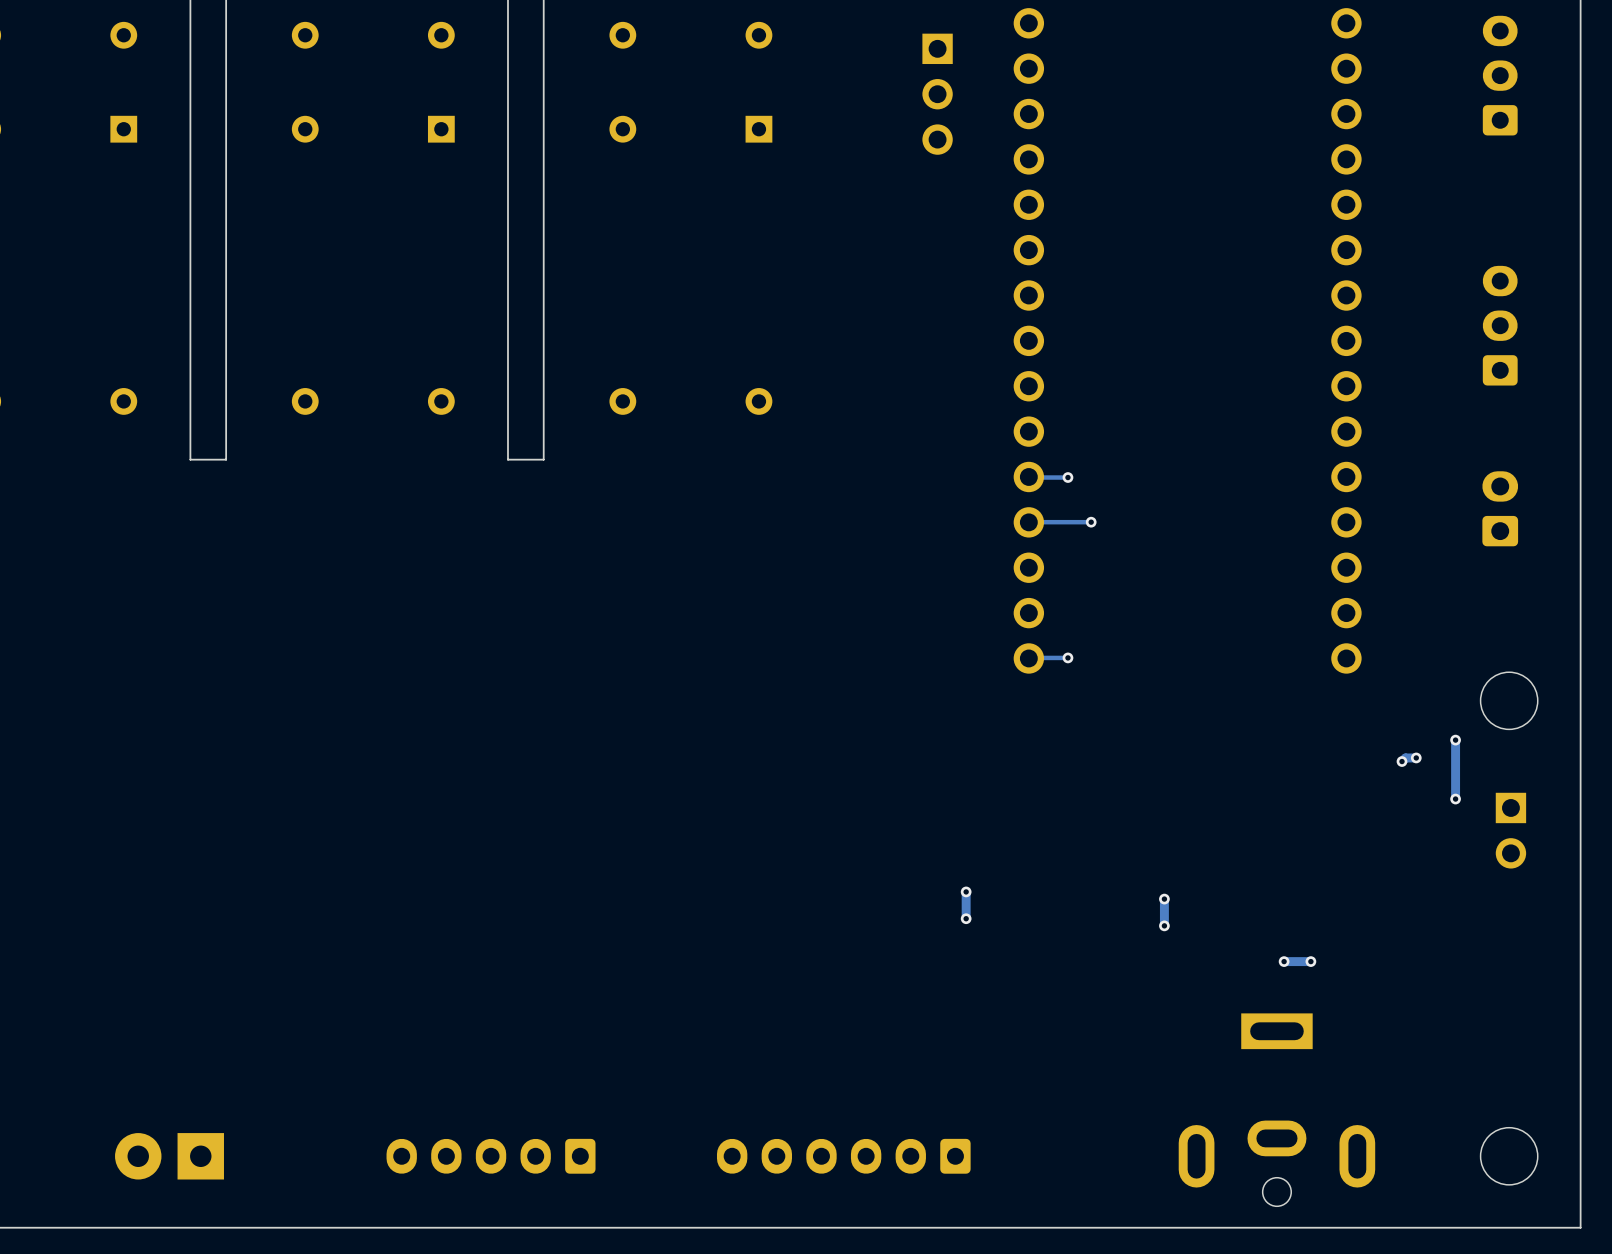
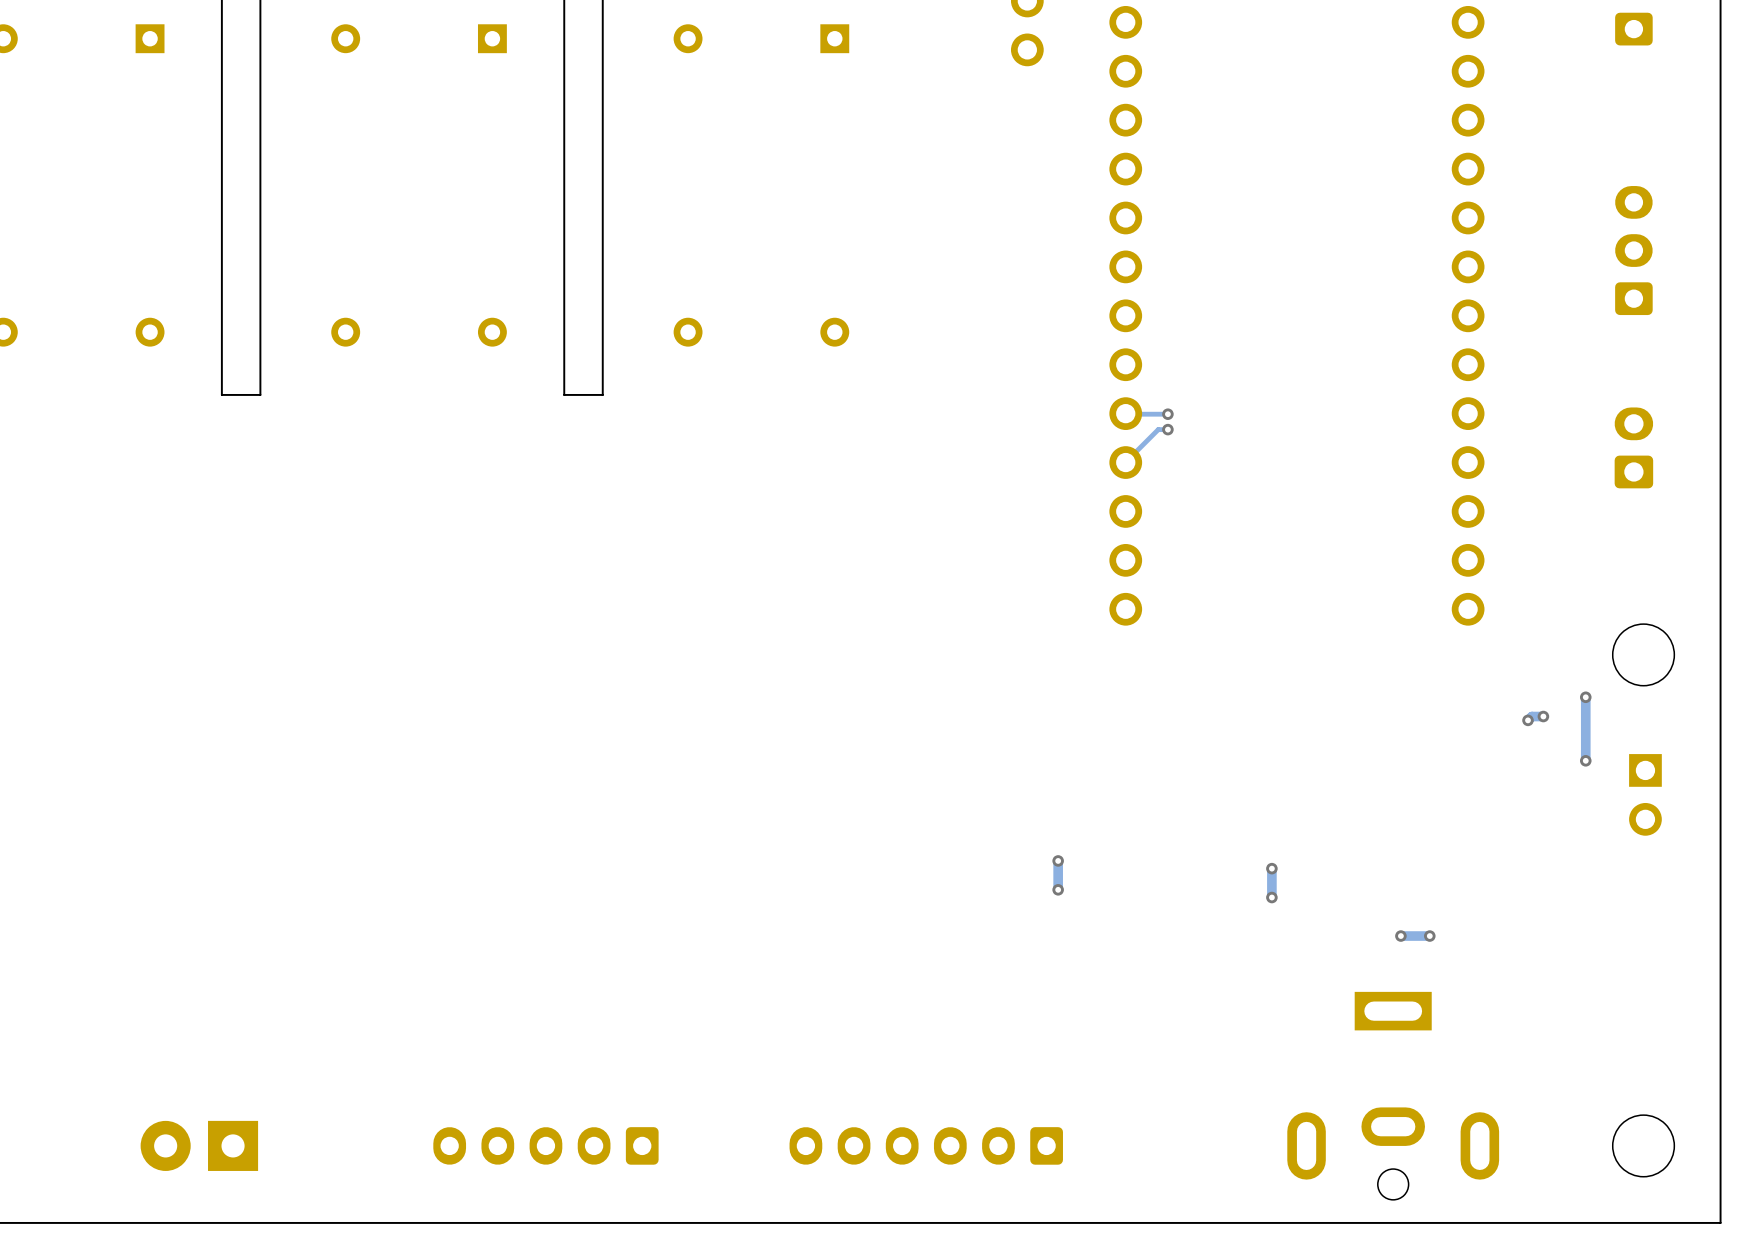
track: (1091, 522) (1028, 522) -> (1167, 429) (1158, 429) (1125, 462)
via position: (1091, 522) -> (1167, 429)
track: (1067, 657) (1028, 657) -> none
via: (1067, 657) -> none

